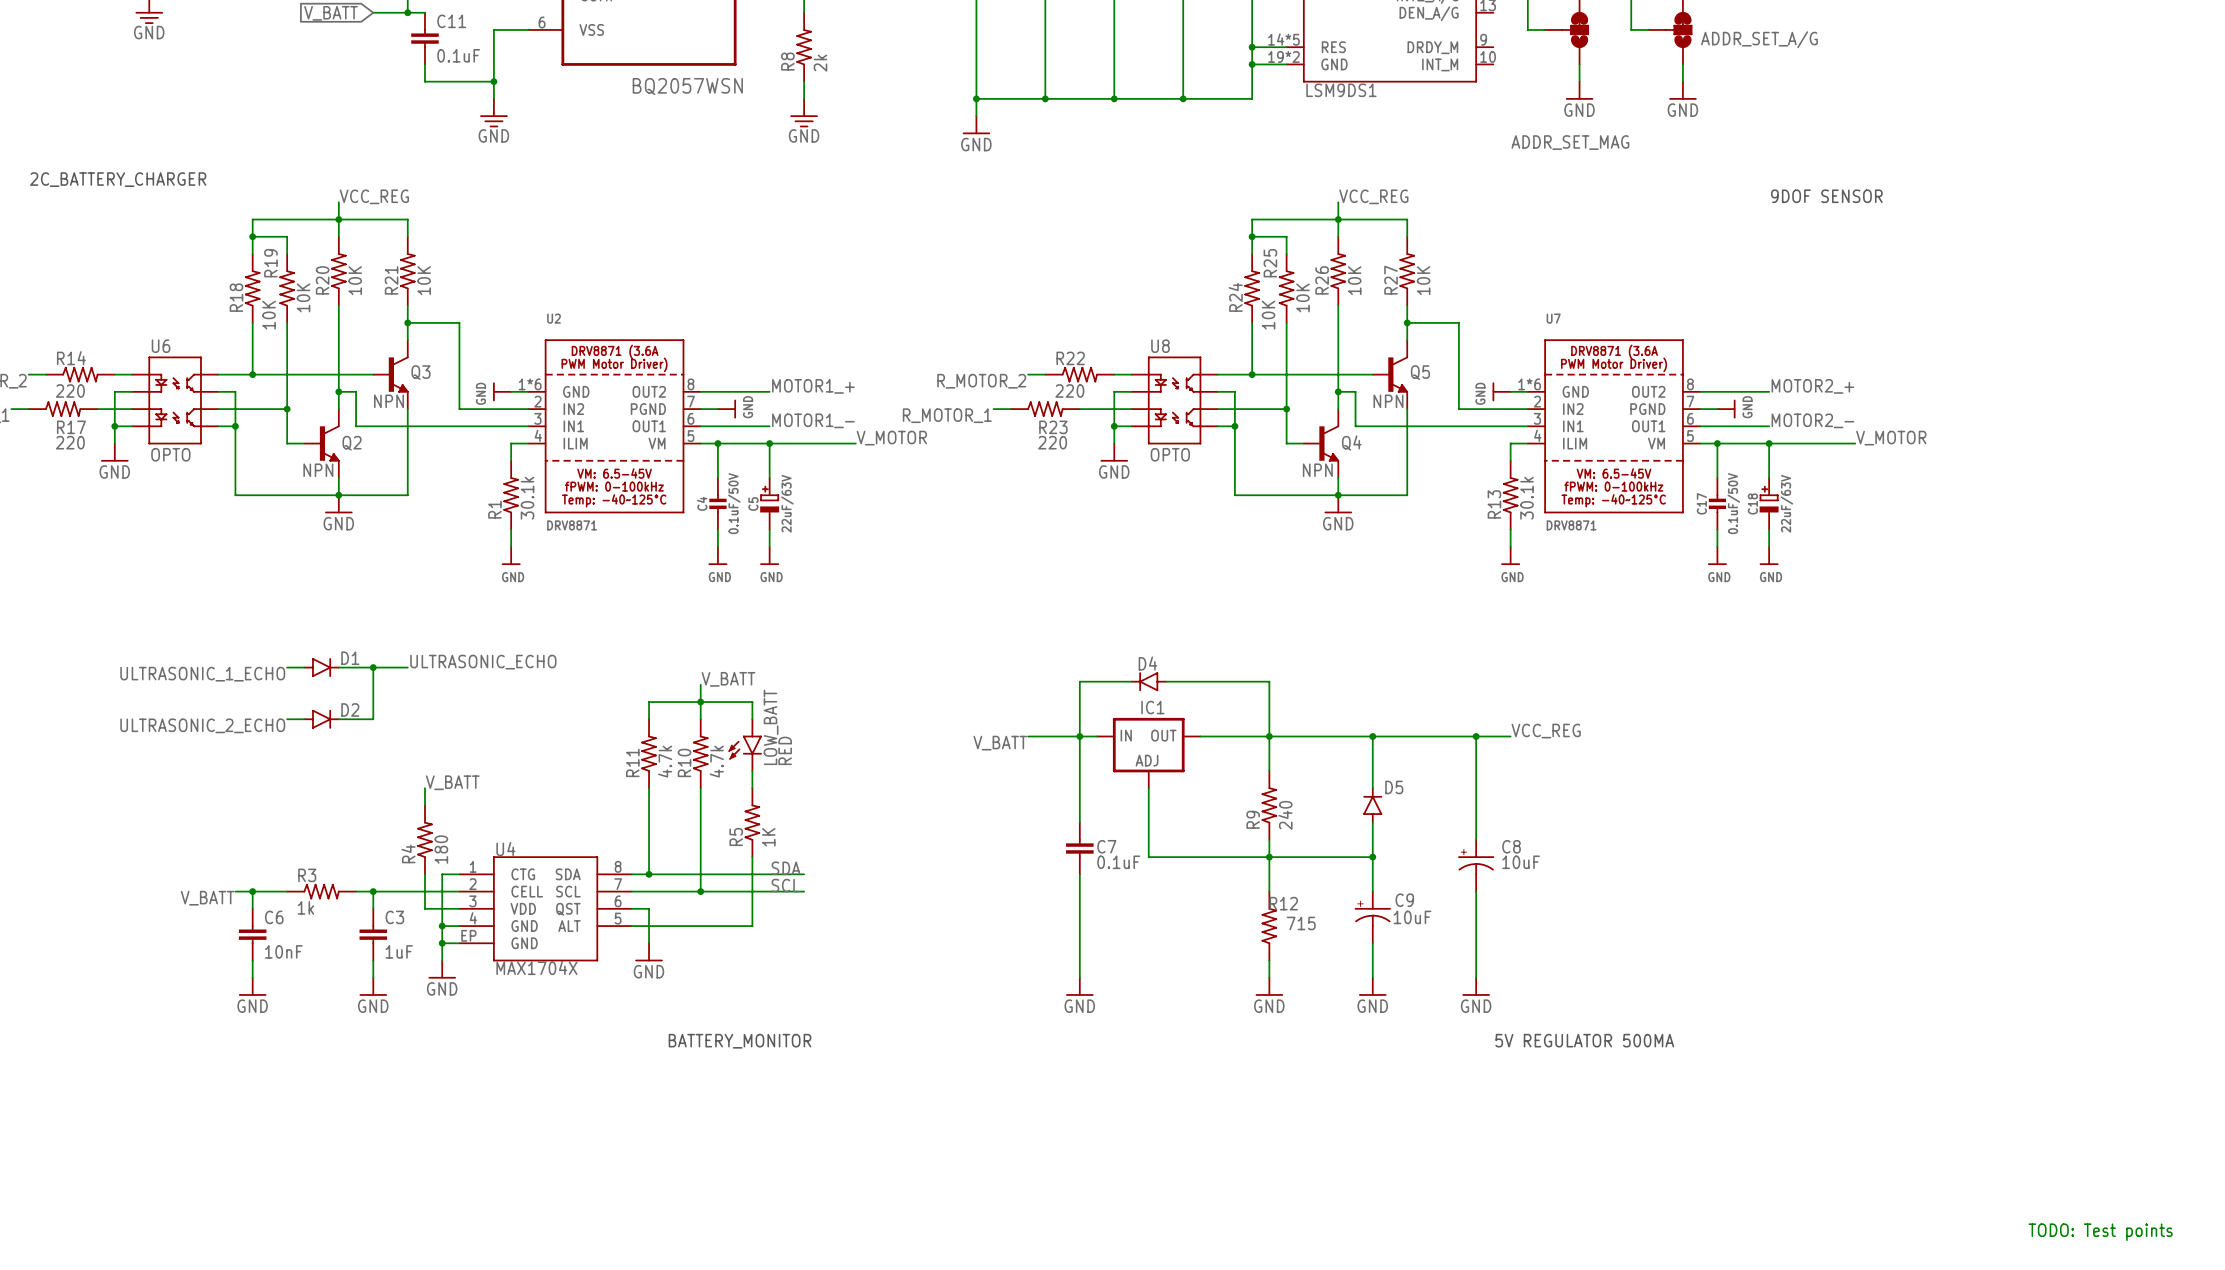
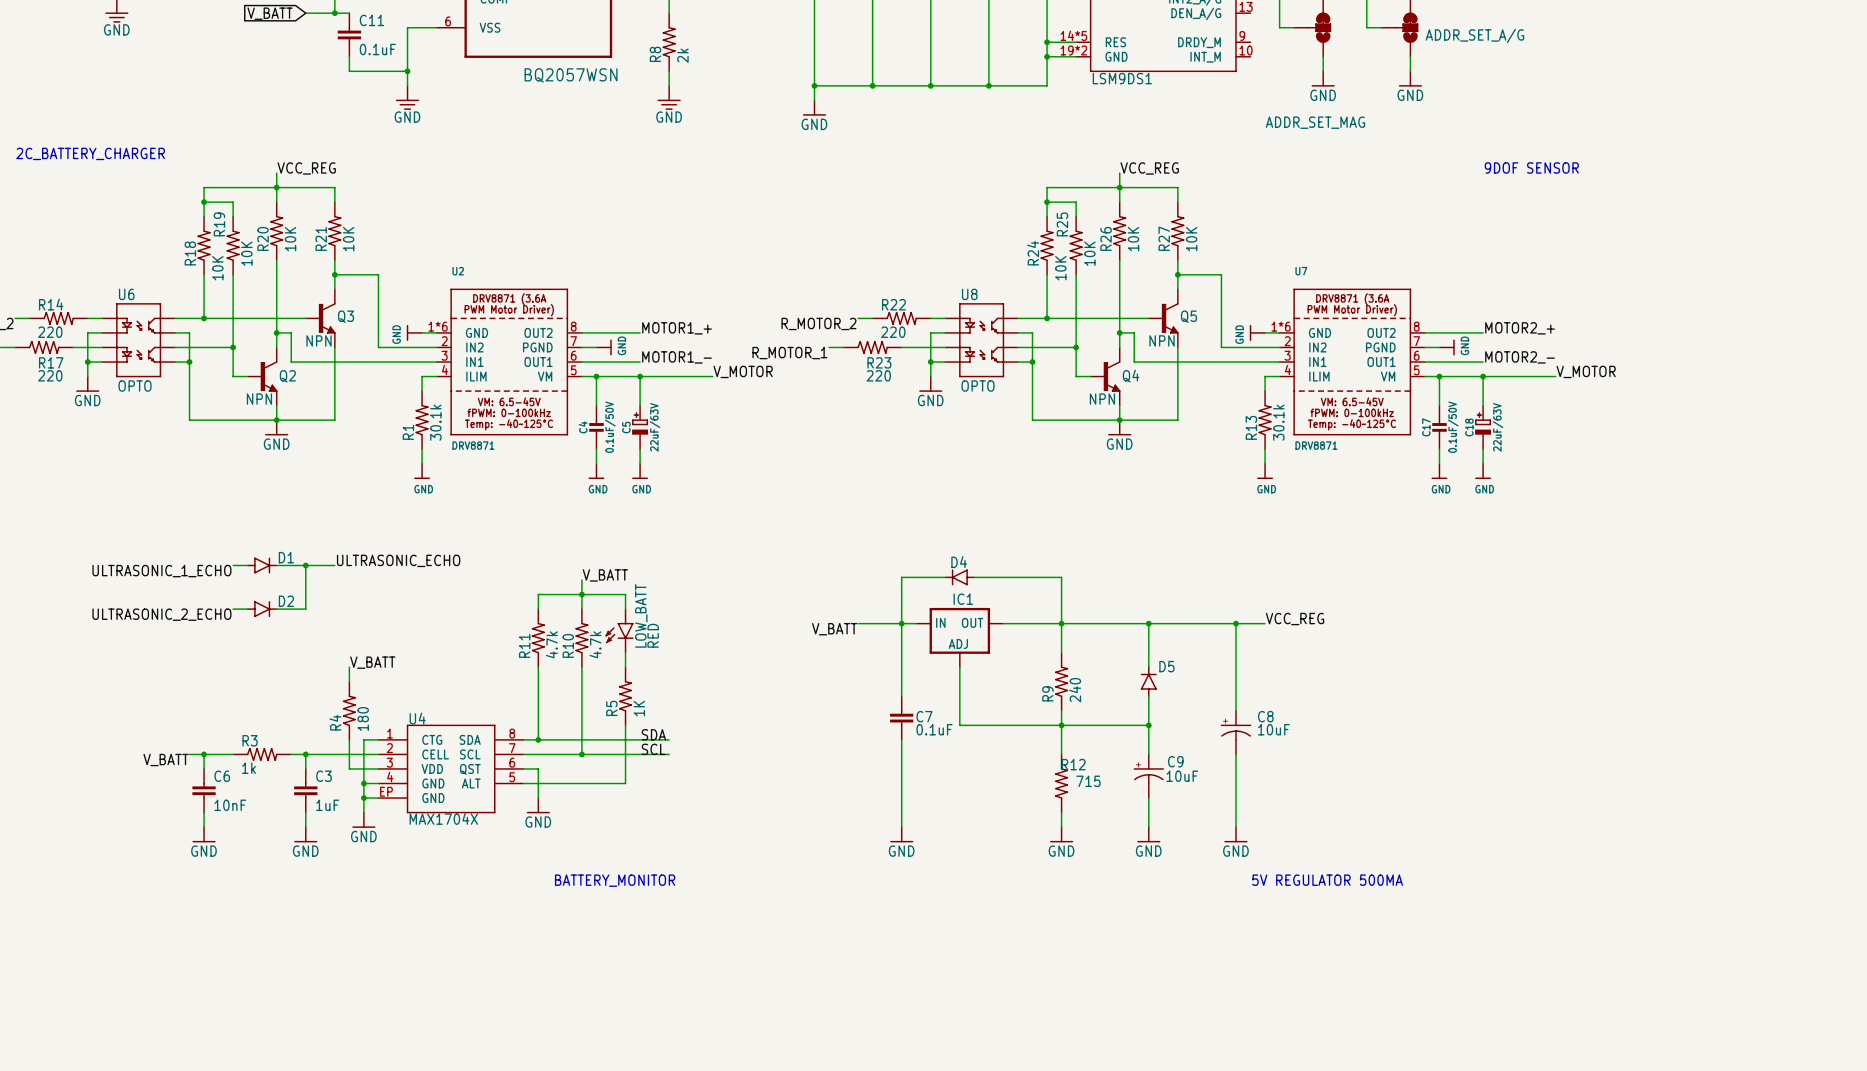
text: TODO: Test points (2100, 1232) -> none

